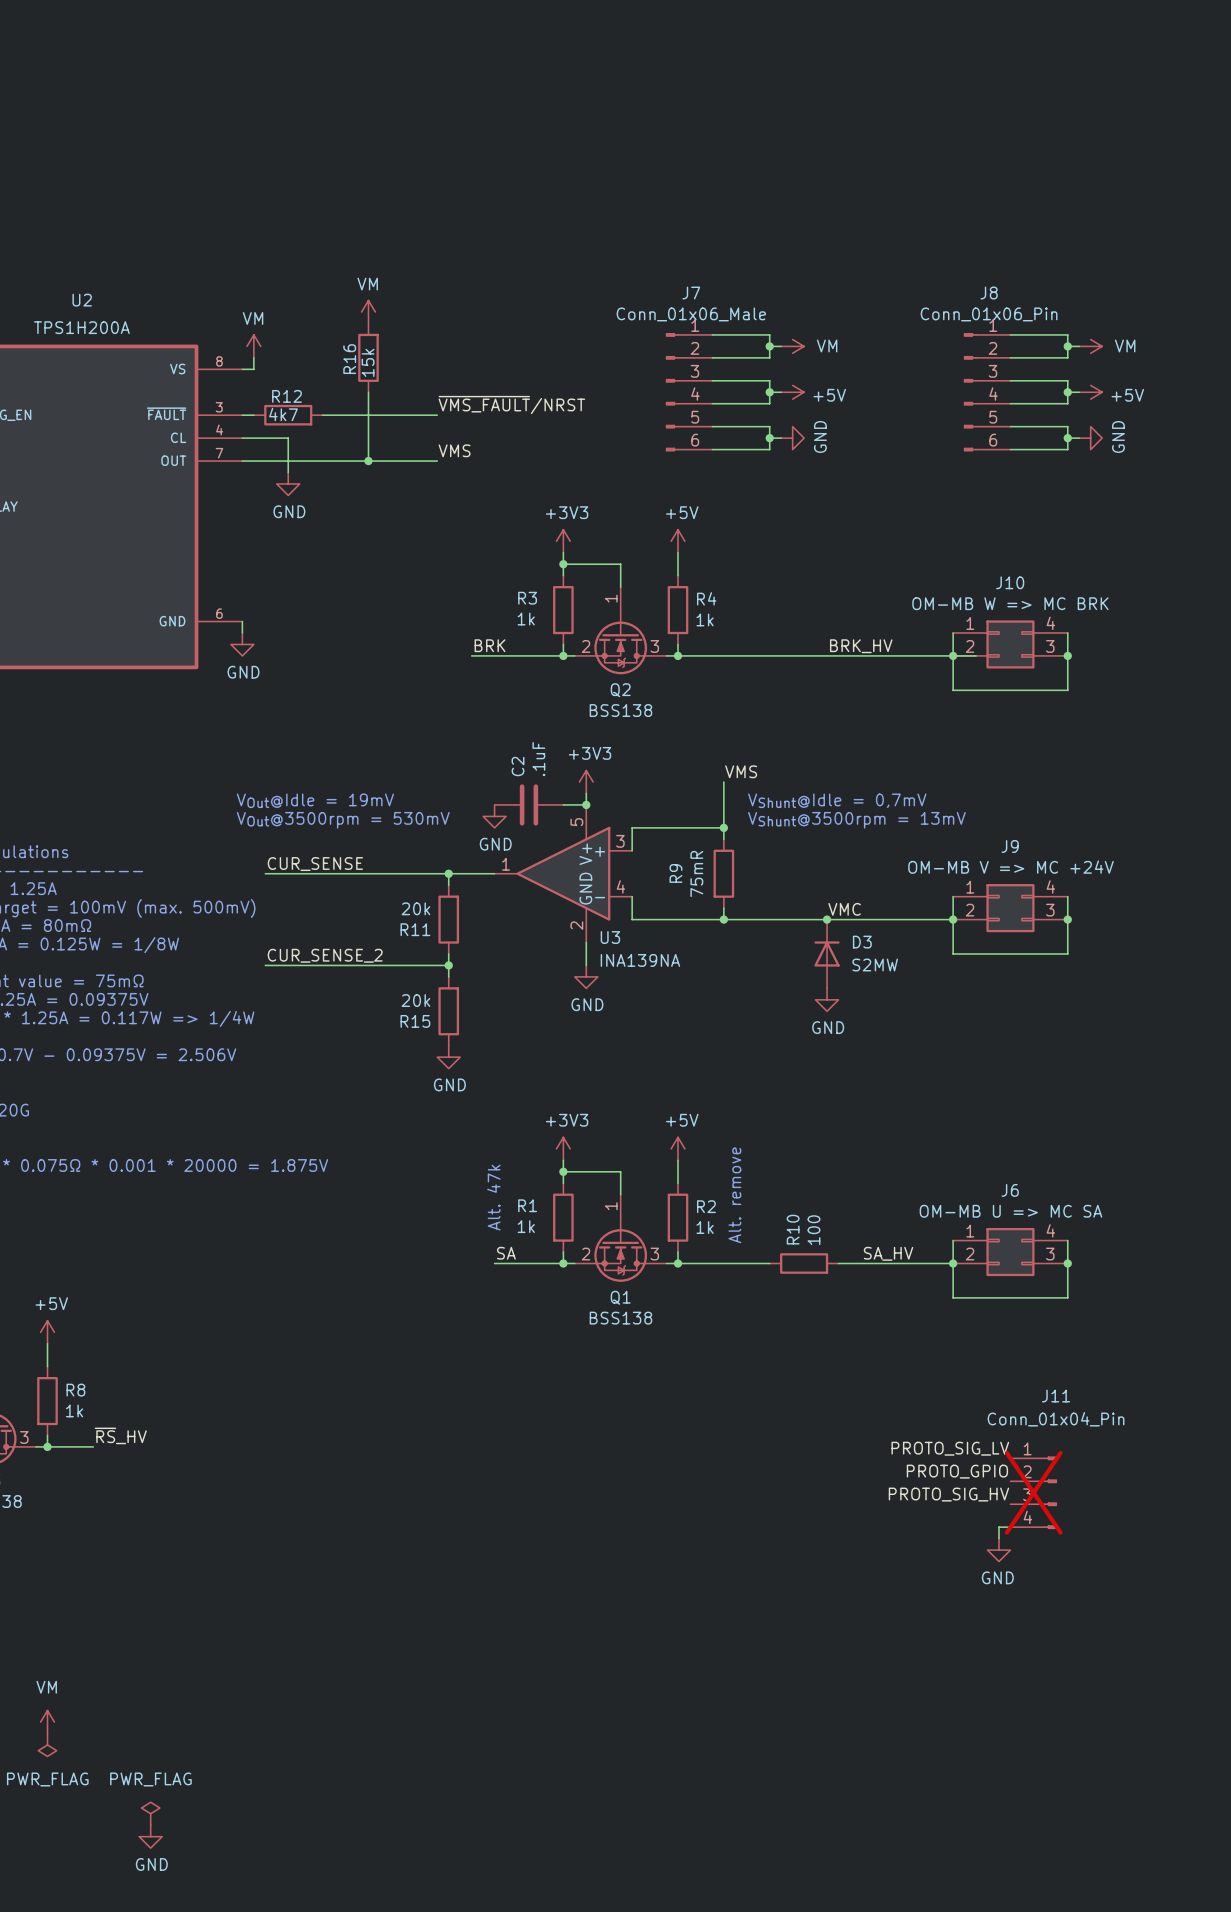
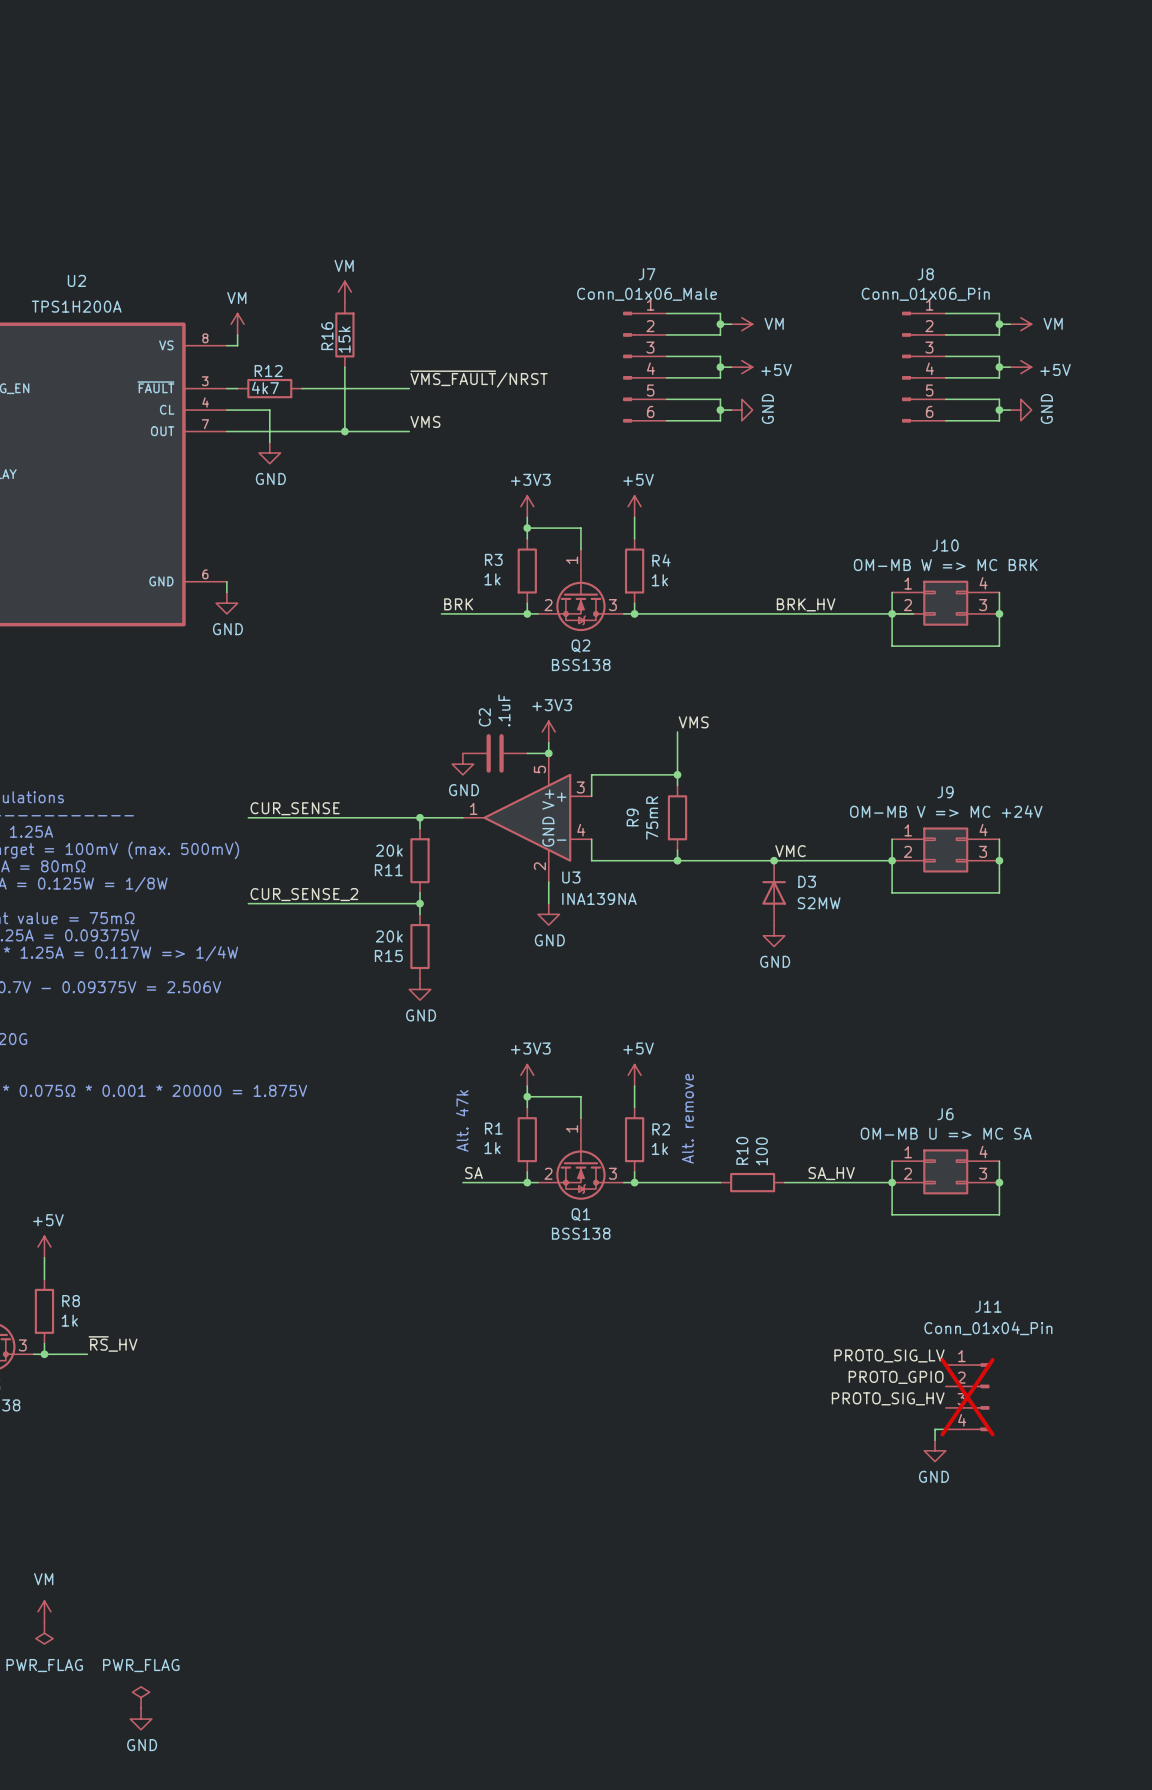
text: VOut@Idle = 19mV (315, 800) -> none
text: VShunt@Idle = 0,7mV (837, 800) -> none
text: VOut@3500rpm = 530mV (343, 820) -> none
text: VShunt@3500rpm = 13mV (856, 820) -> none

